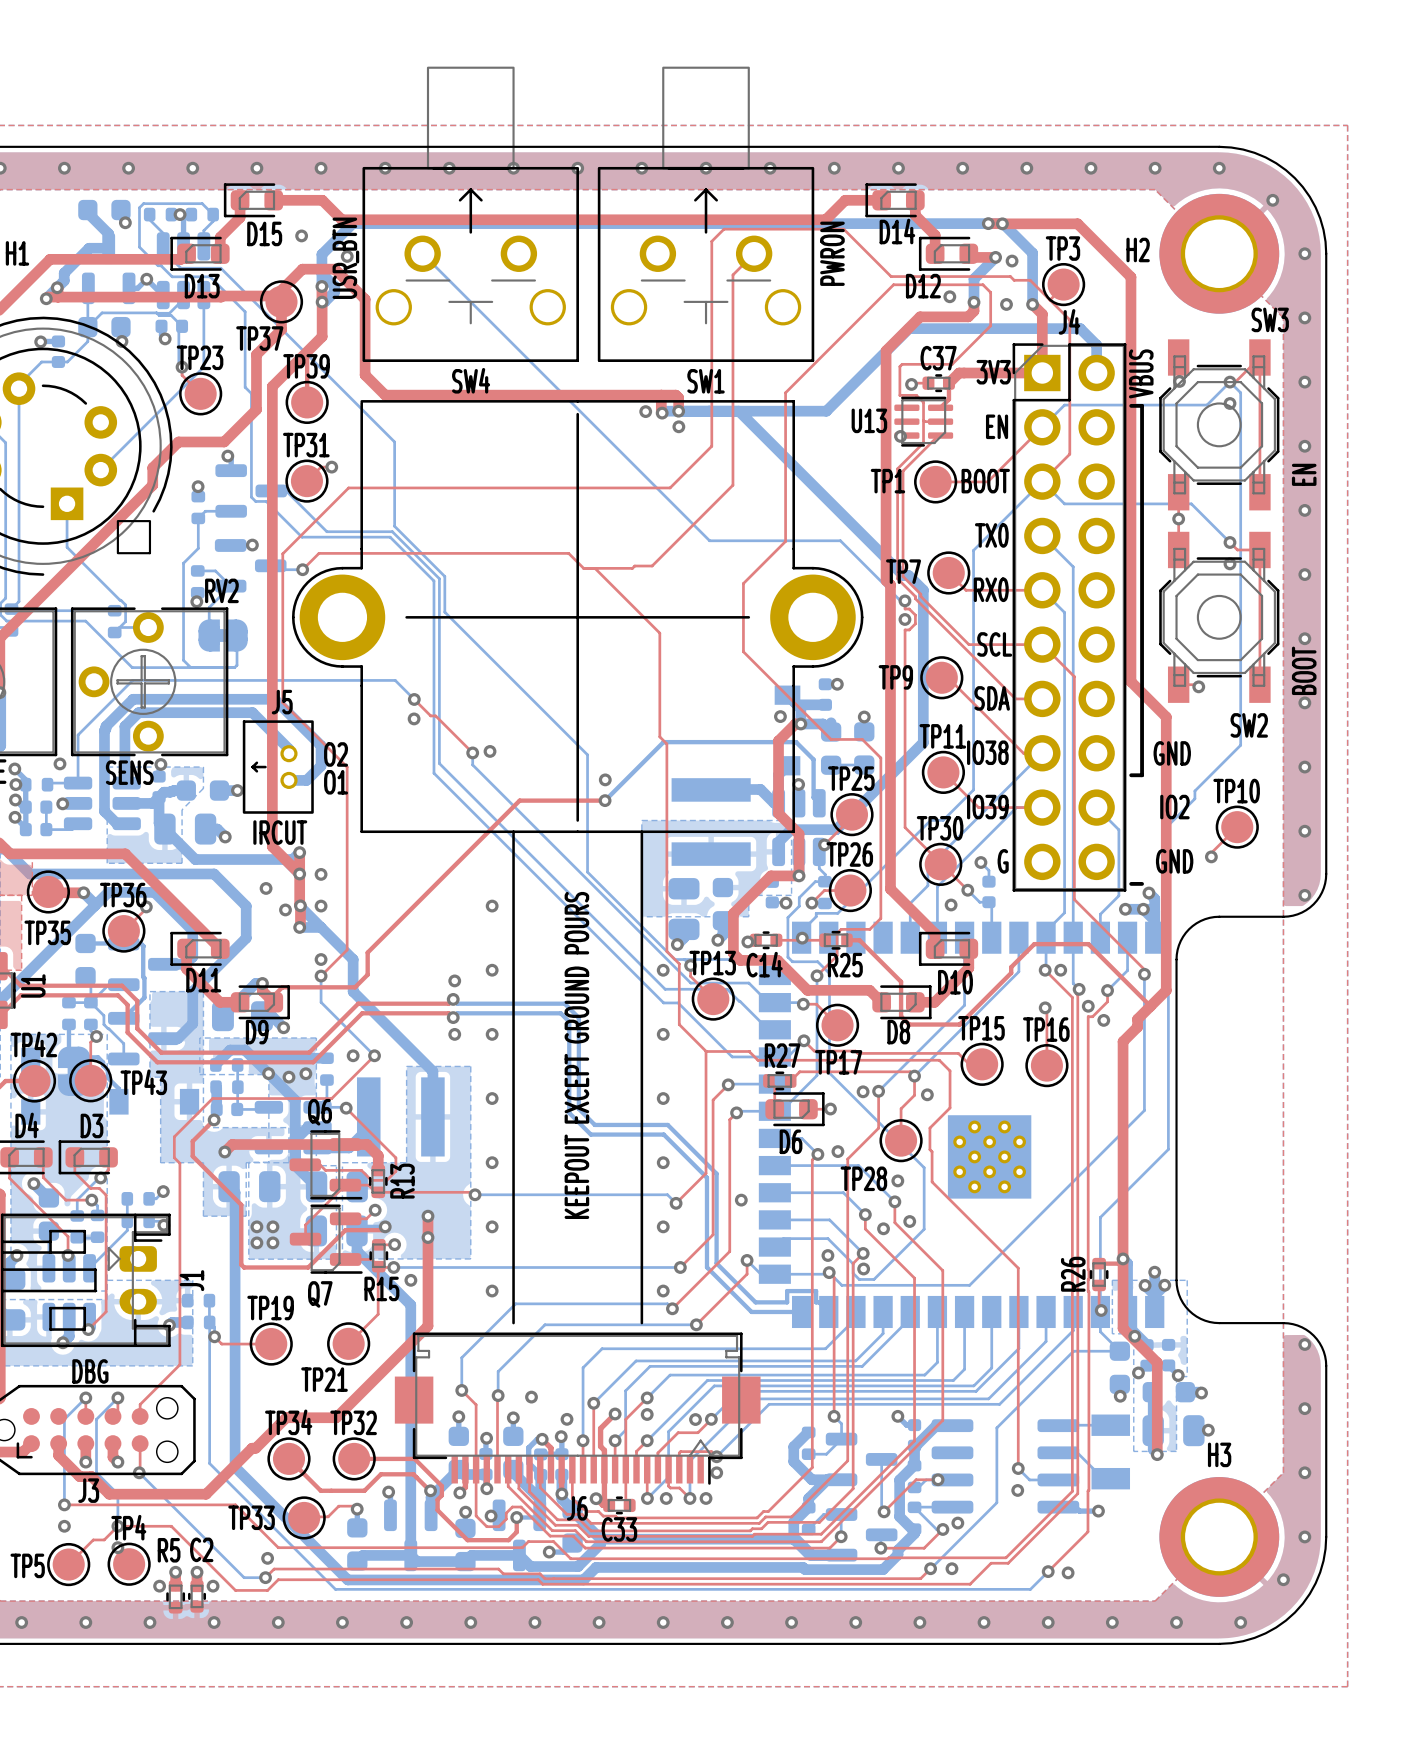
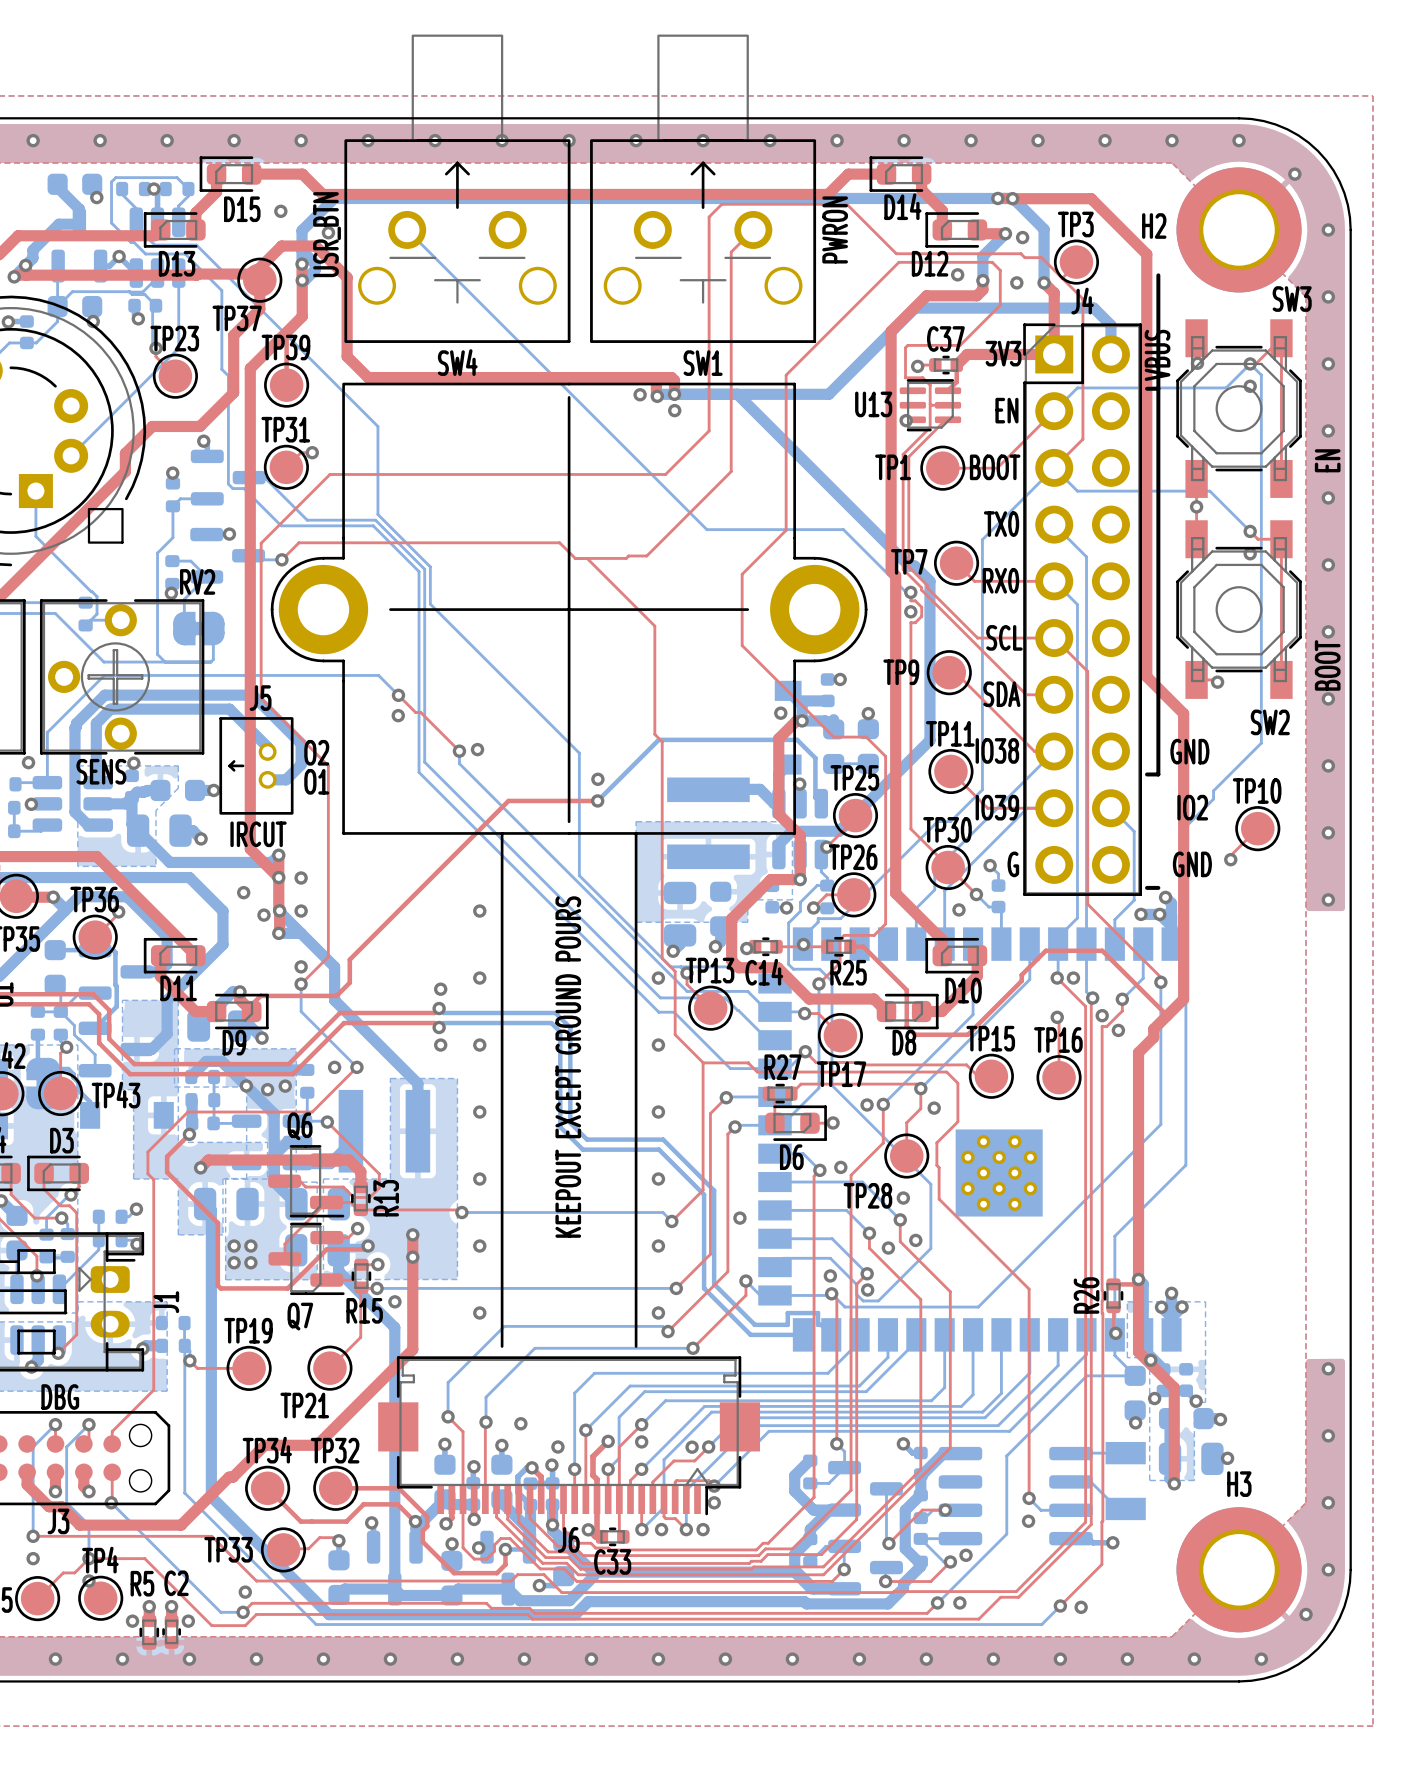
line: none -> (1158, 275) (1158, 388)
board edge: (1326, 873) (1323, 888) (1319, 896) (1310, 907) (1302, 912) (1288, 916) (1209, 917) (1192, 926) (1183, 936) (1178, 945) (1176, 959) (1176, 1280) (1180, 1298) (1189, 1310) (1196, 1316) (1214, 1322) (1283, 1323) (1297, 1325) (1310, 1332) (1316, 1339) (1323, 1351) (1326, 1365) -> (1350, 877) (1350, 1391)

